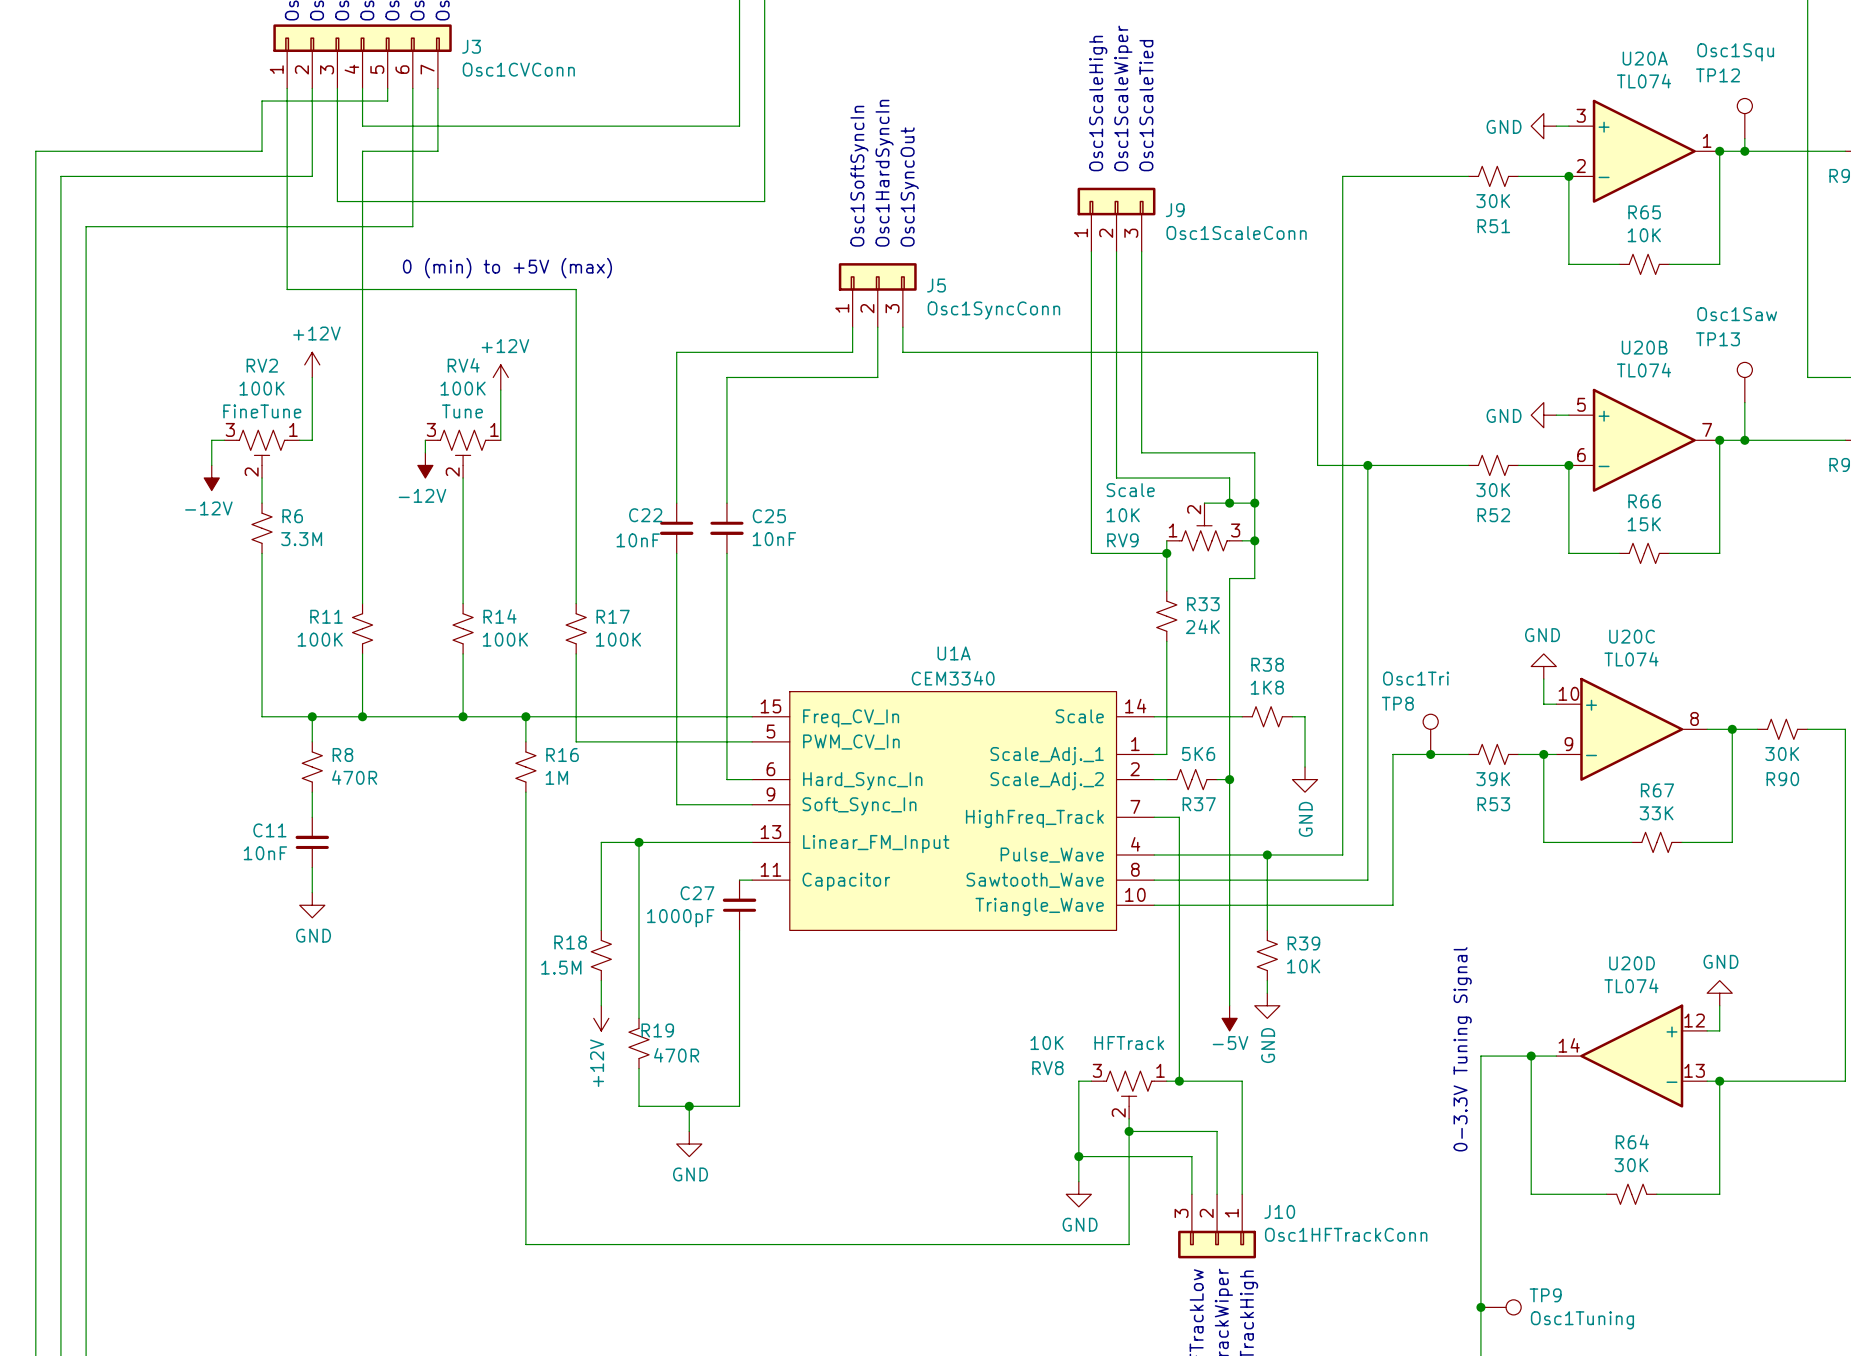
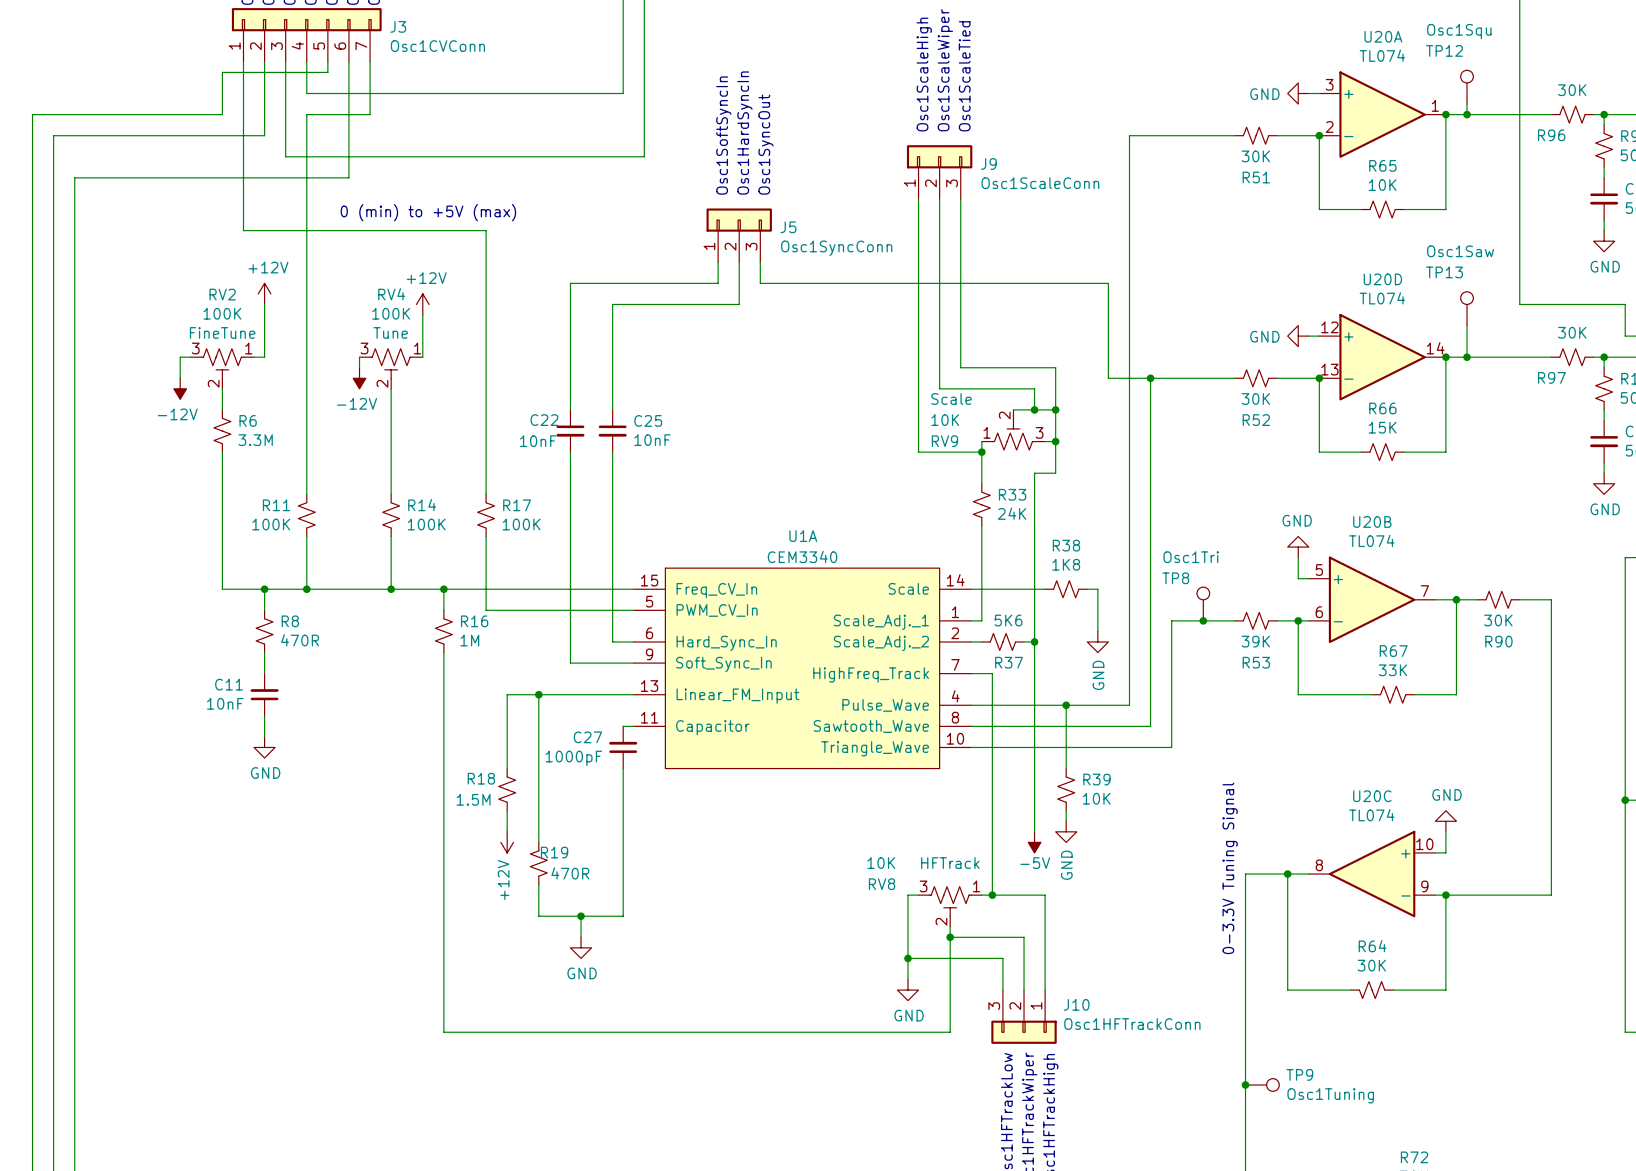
U20B position: (1644, 440) -> (1372, 599)
U20C flip: as is (1631, 729) -> left-right (1372, 874)
U20C position: (1631, 729) -> (1372, 874)
U20D flip: as is (1631, 1056) -> left-right (1382, 357)
U20D position: (1631, 1056) -> (1382, 357)

